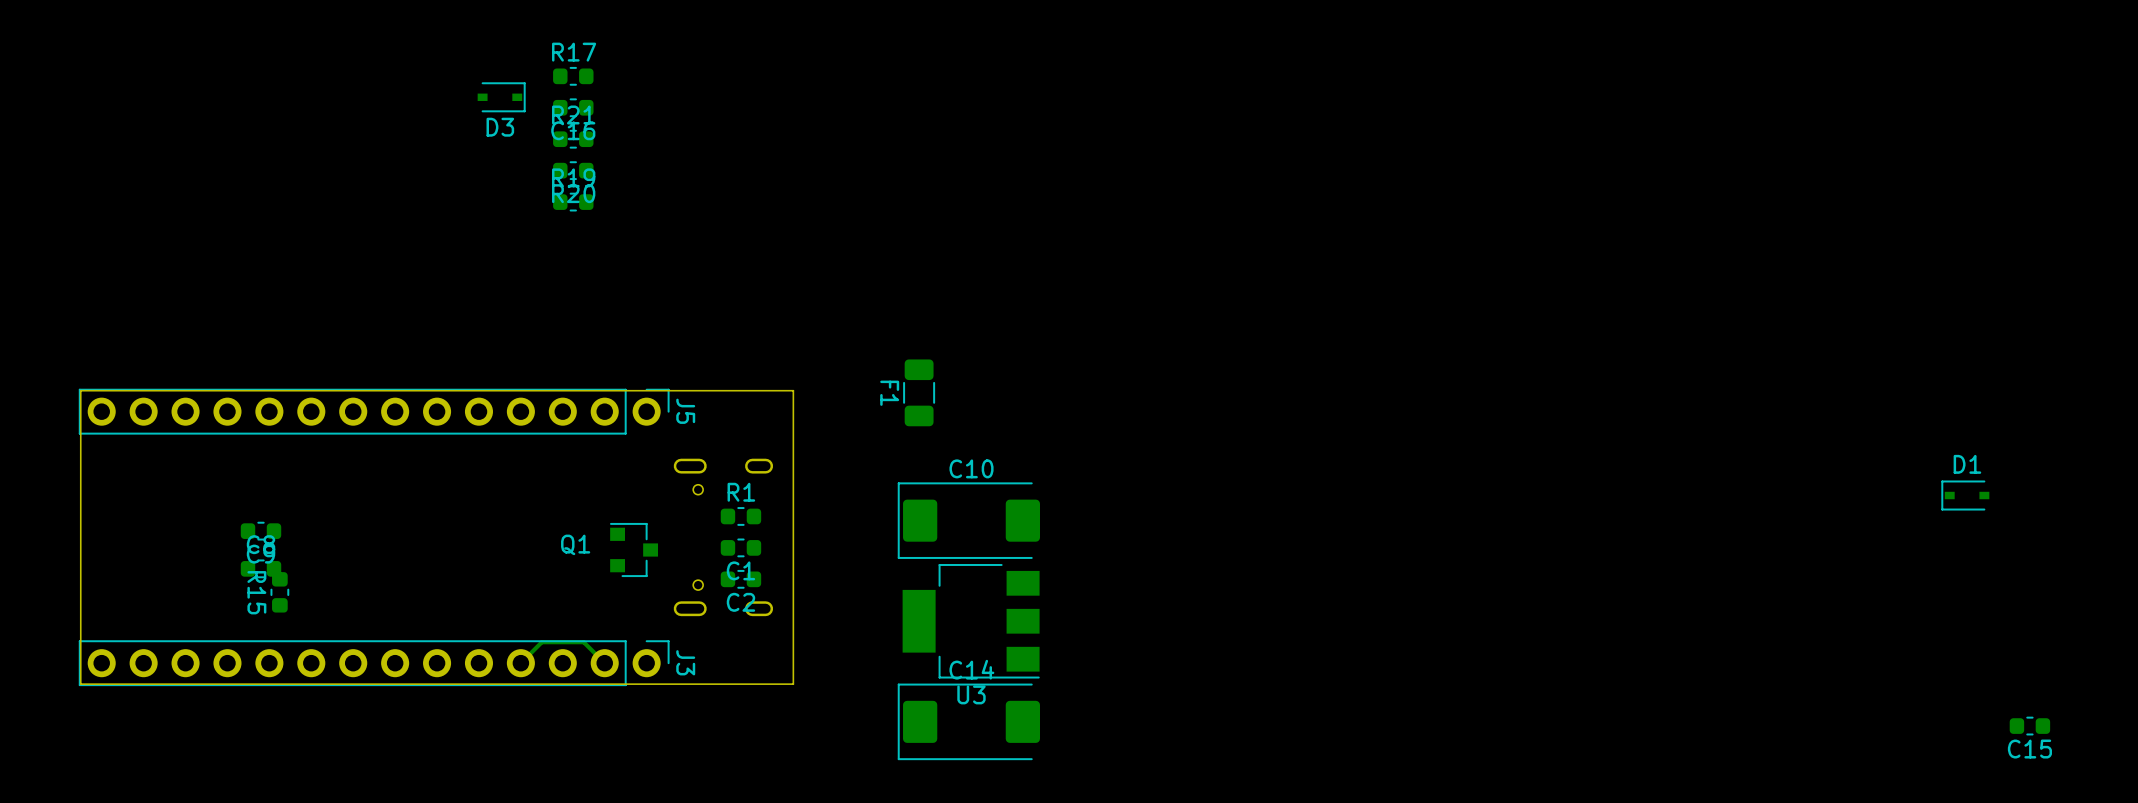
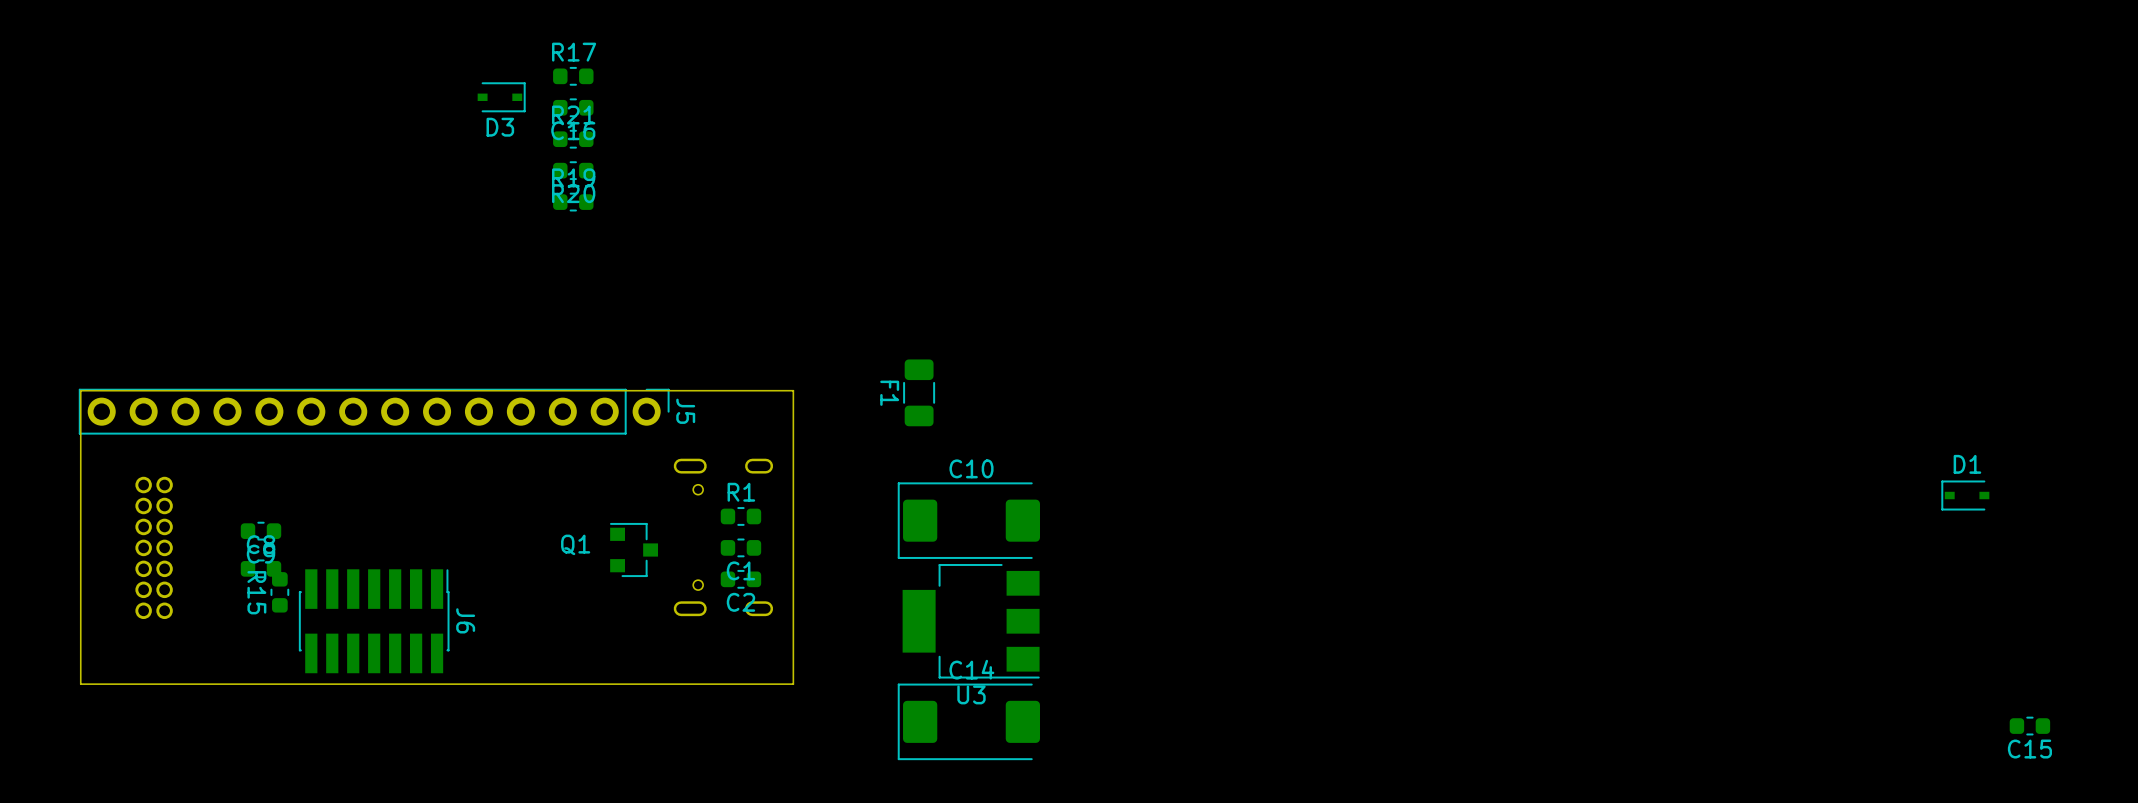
part: none -> (154, 547)
J6: none -> (374, 621)
J3: (374, 663) -> none
track: (604, 663) (583, 642) (541, 642) (520, 663) -> none

